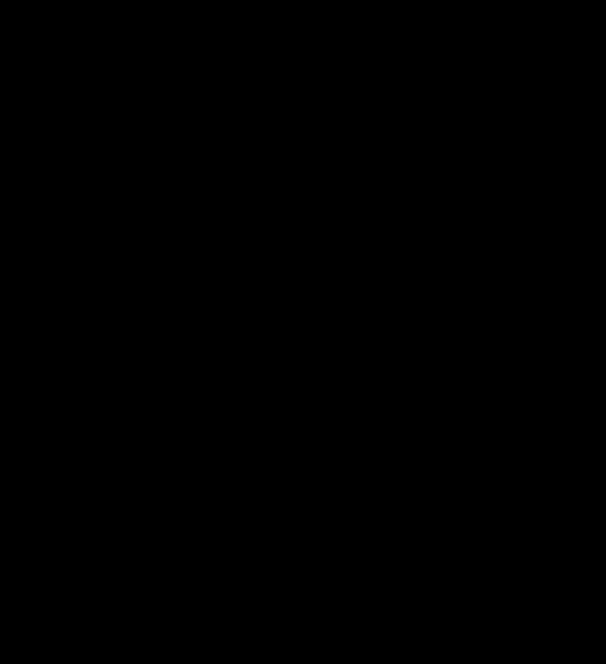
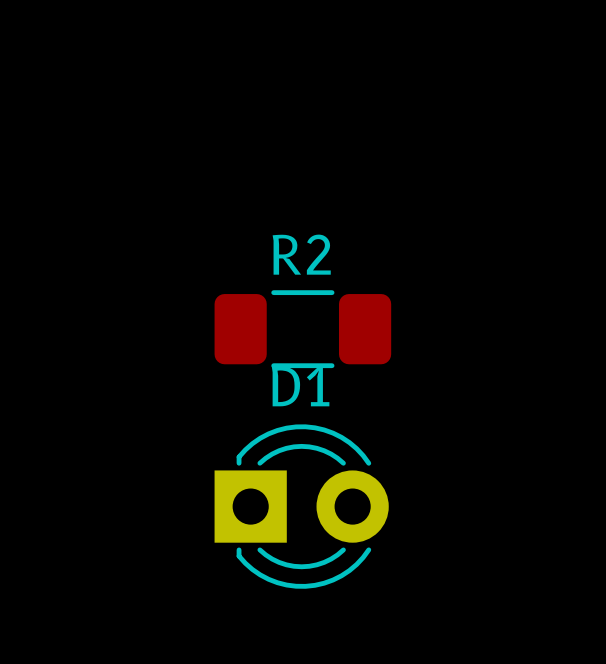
R2: none -> (302, 329)
D1: none -> (301, 506)

